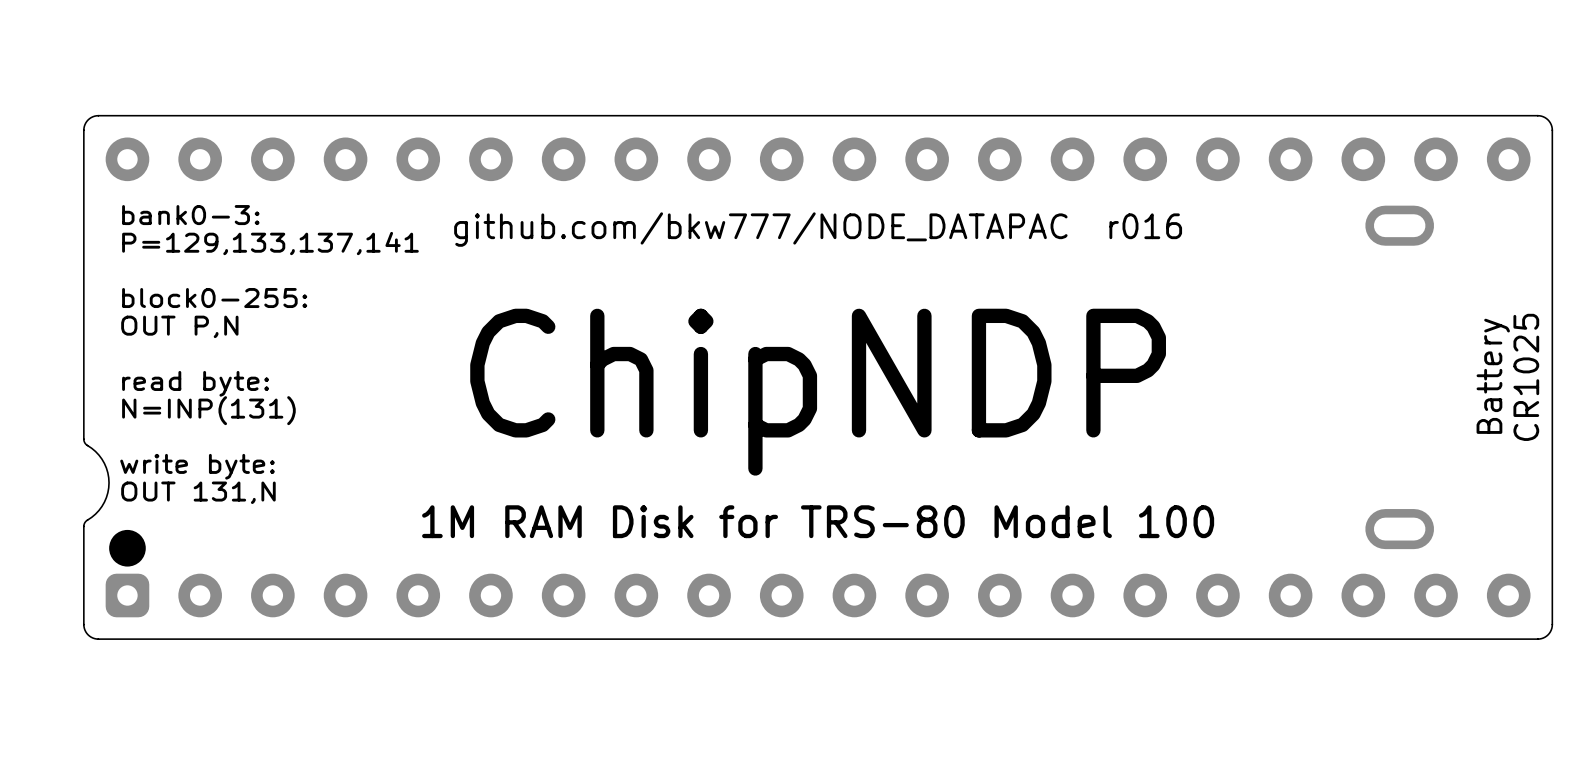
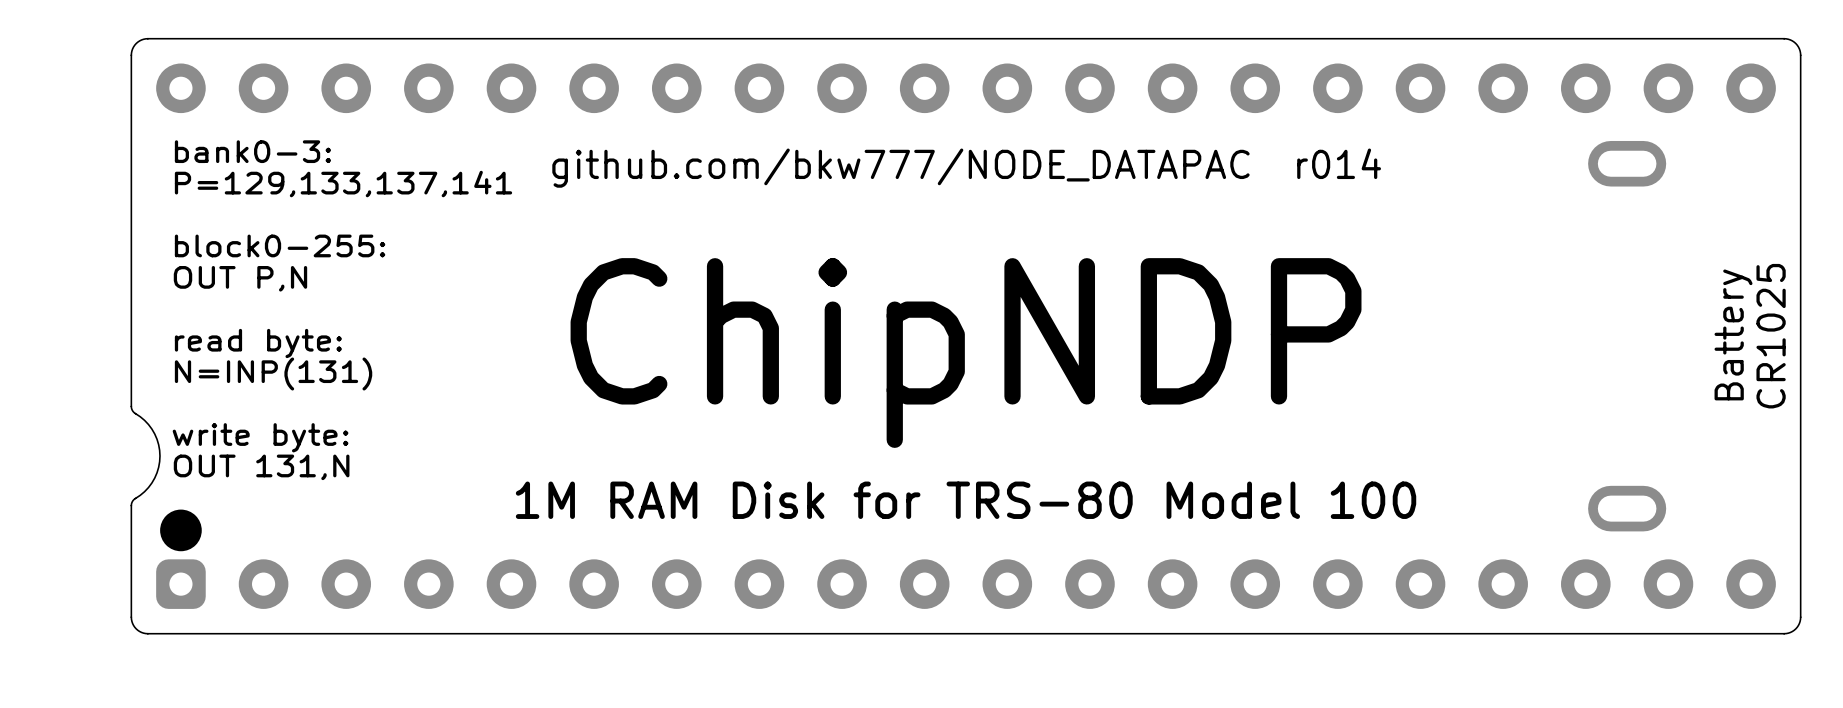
text: github.com/bkw777/NODE_DATAPAC r016 (818, 229) -> github.com/bkw777/NODE_DATAPAC r014 (966, 168)

